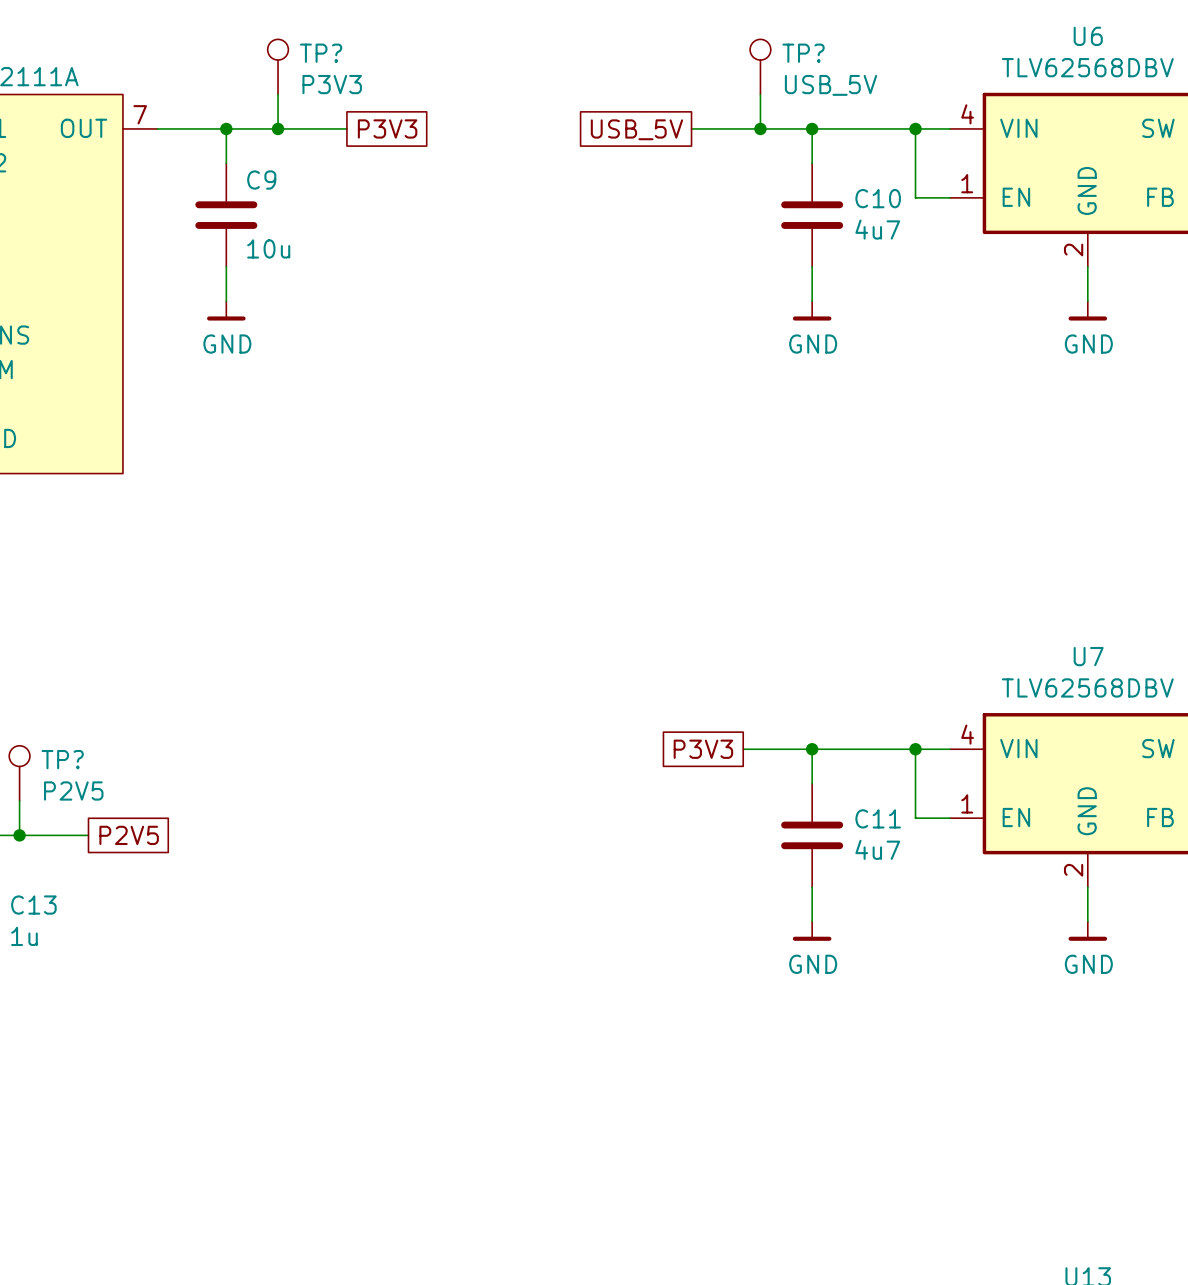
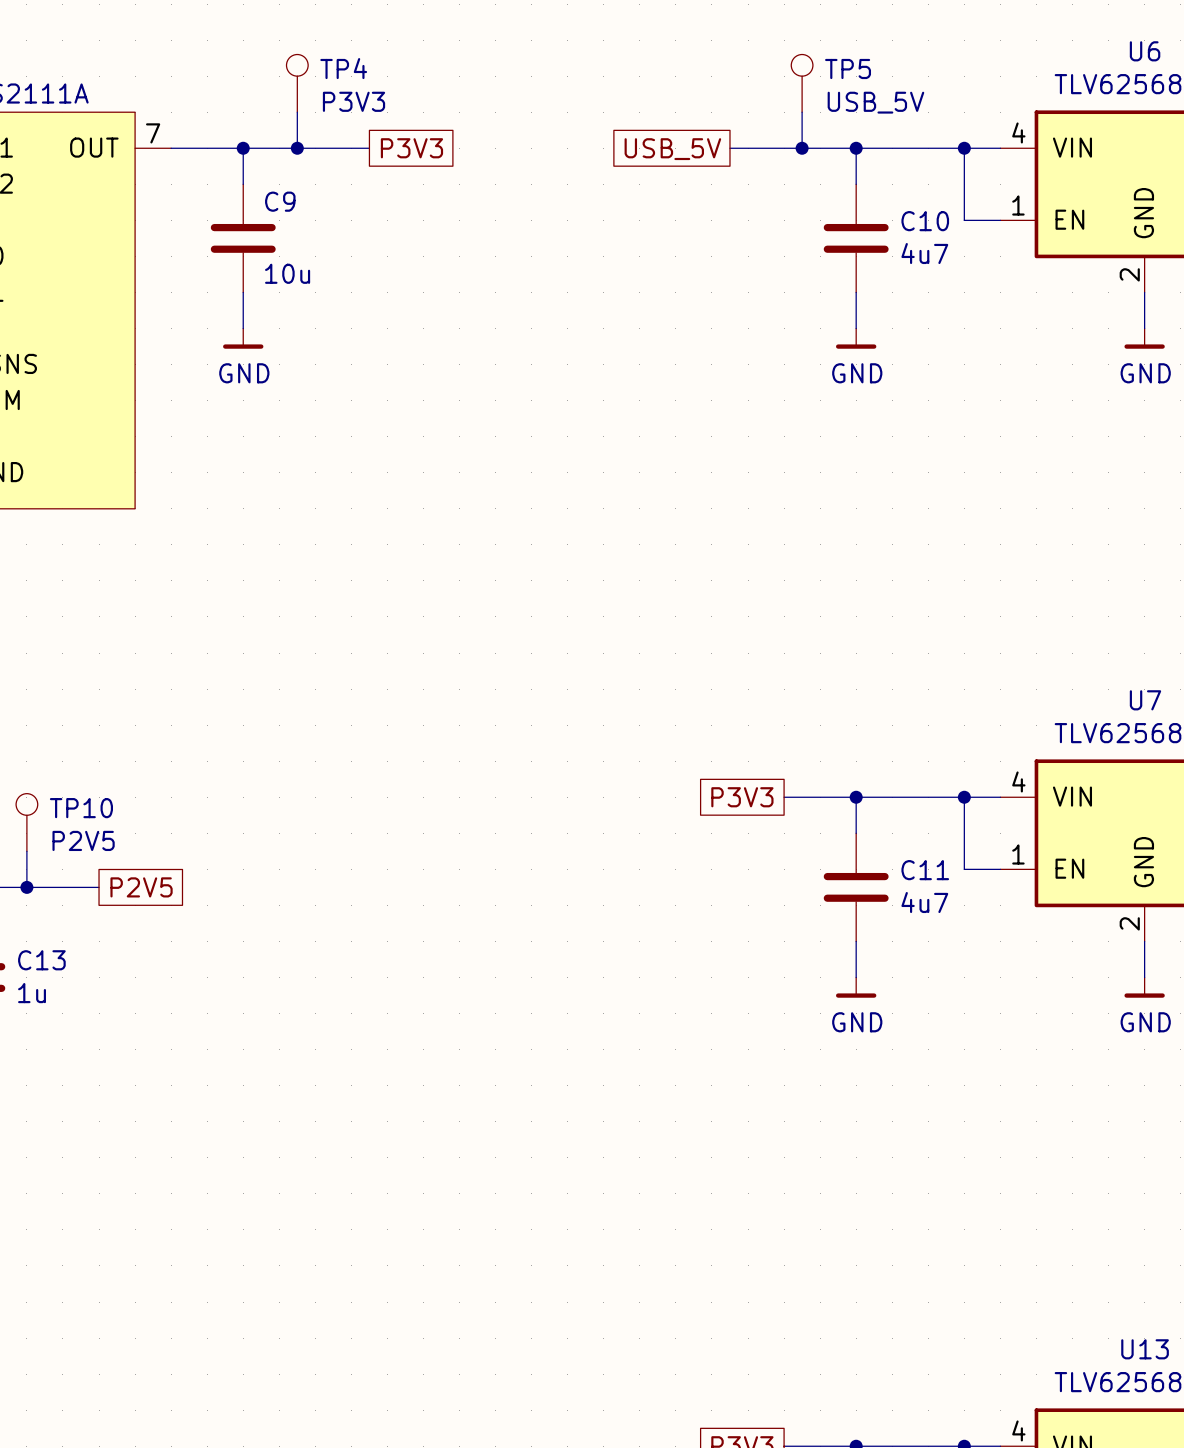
TP? name: TP? (321, 53) -> TP4 (343, 68)
TP? name: TP? (803, 53) -> TP5 (848, 68)
TP? name: TP? (62, 759) -> TP10 (81, 808)

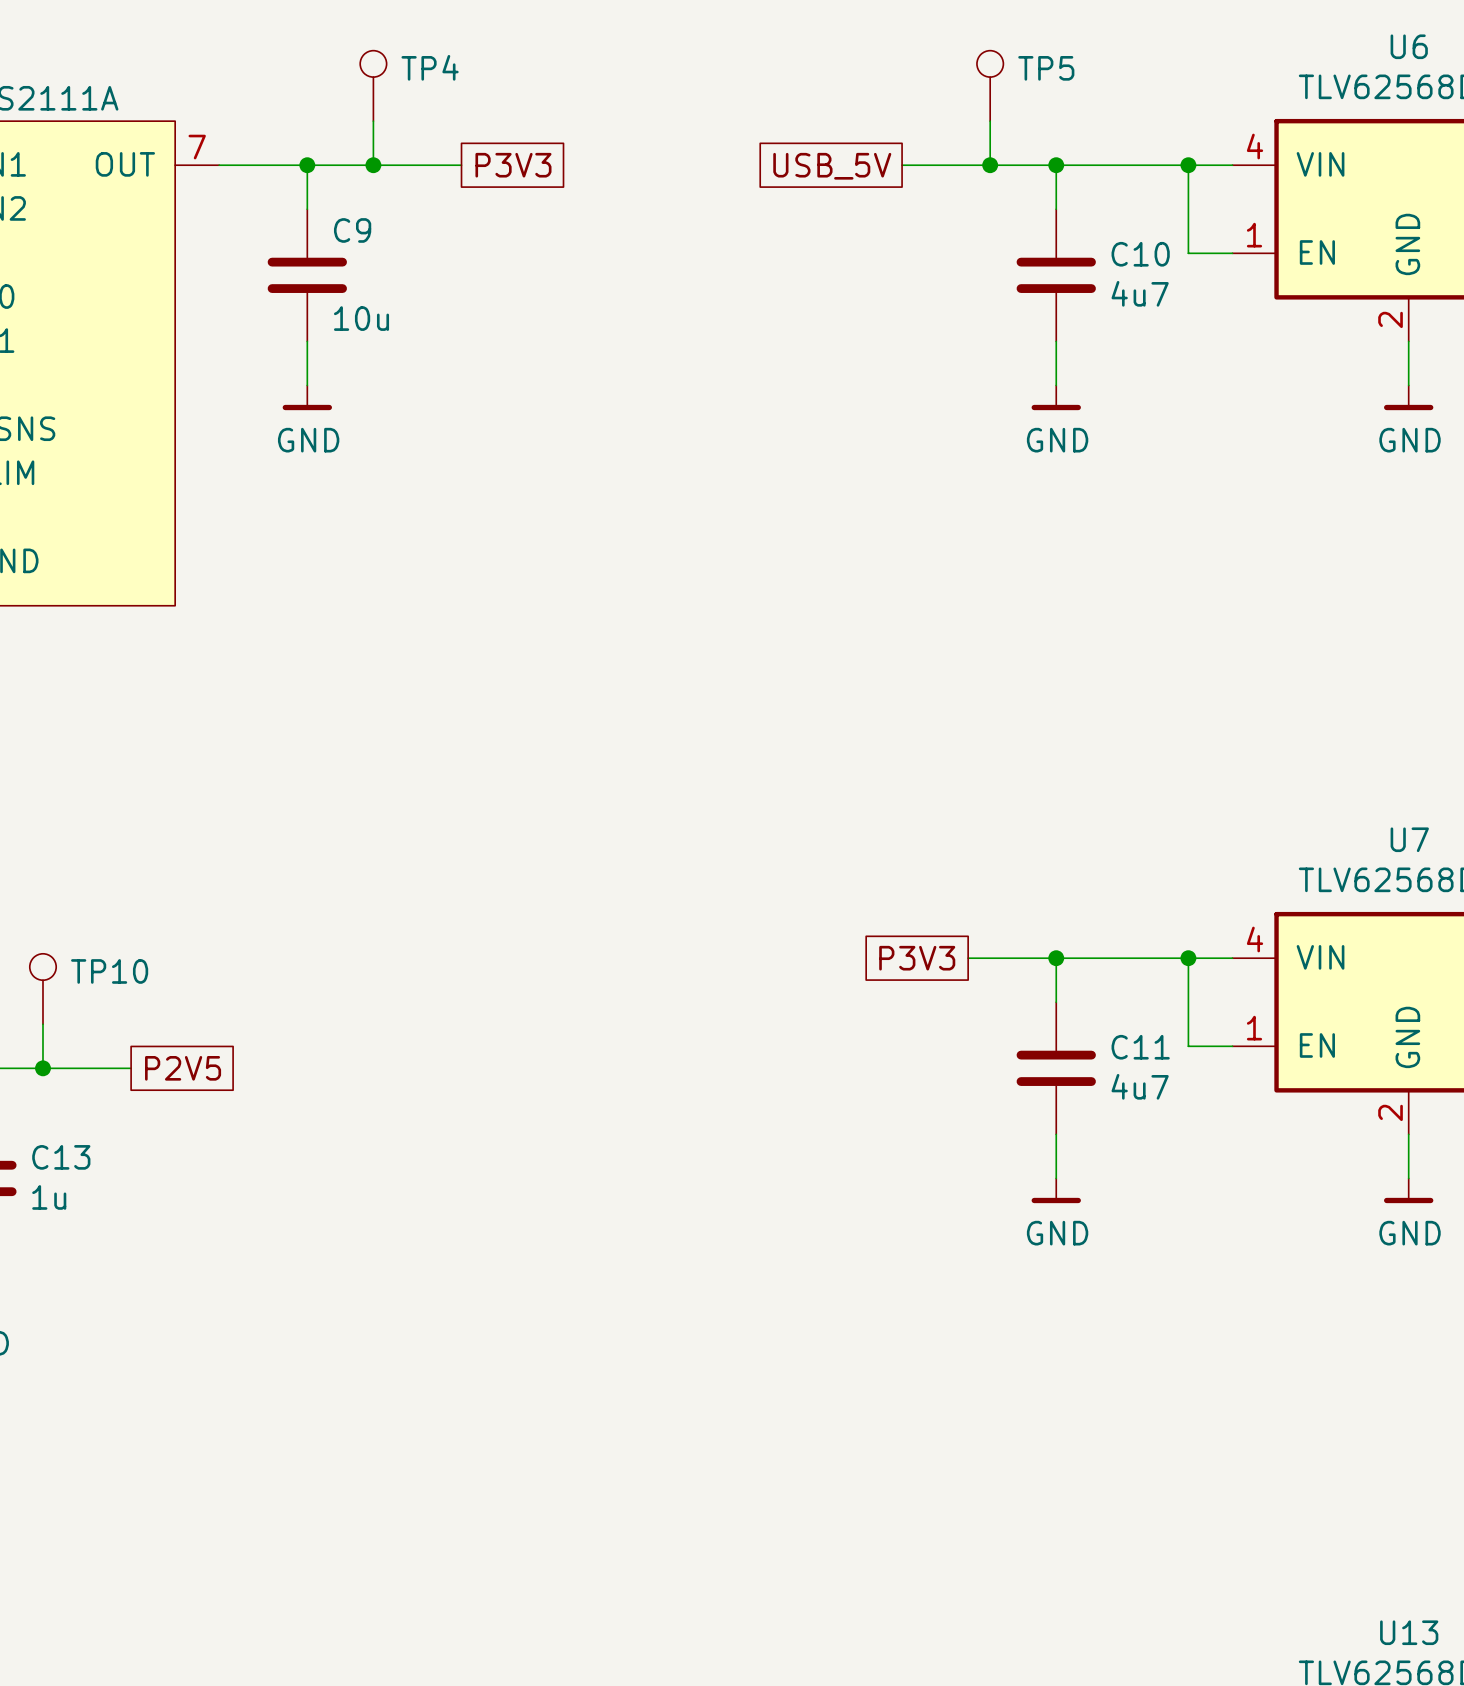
TP4 value: P3V3 (354, 101) -> none
TP5 value: USB_5V (875, 102) -> none
TP10 value: P2V5 (83, 840) -> none

